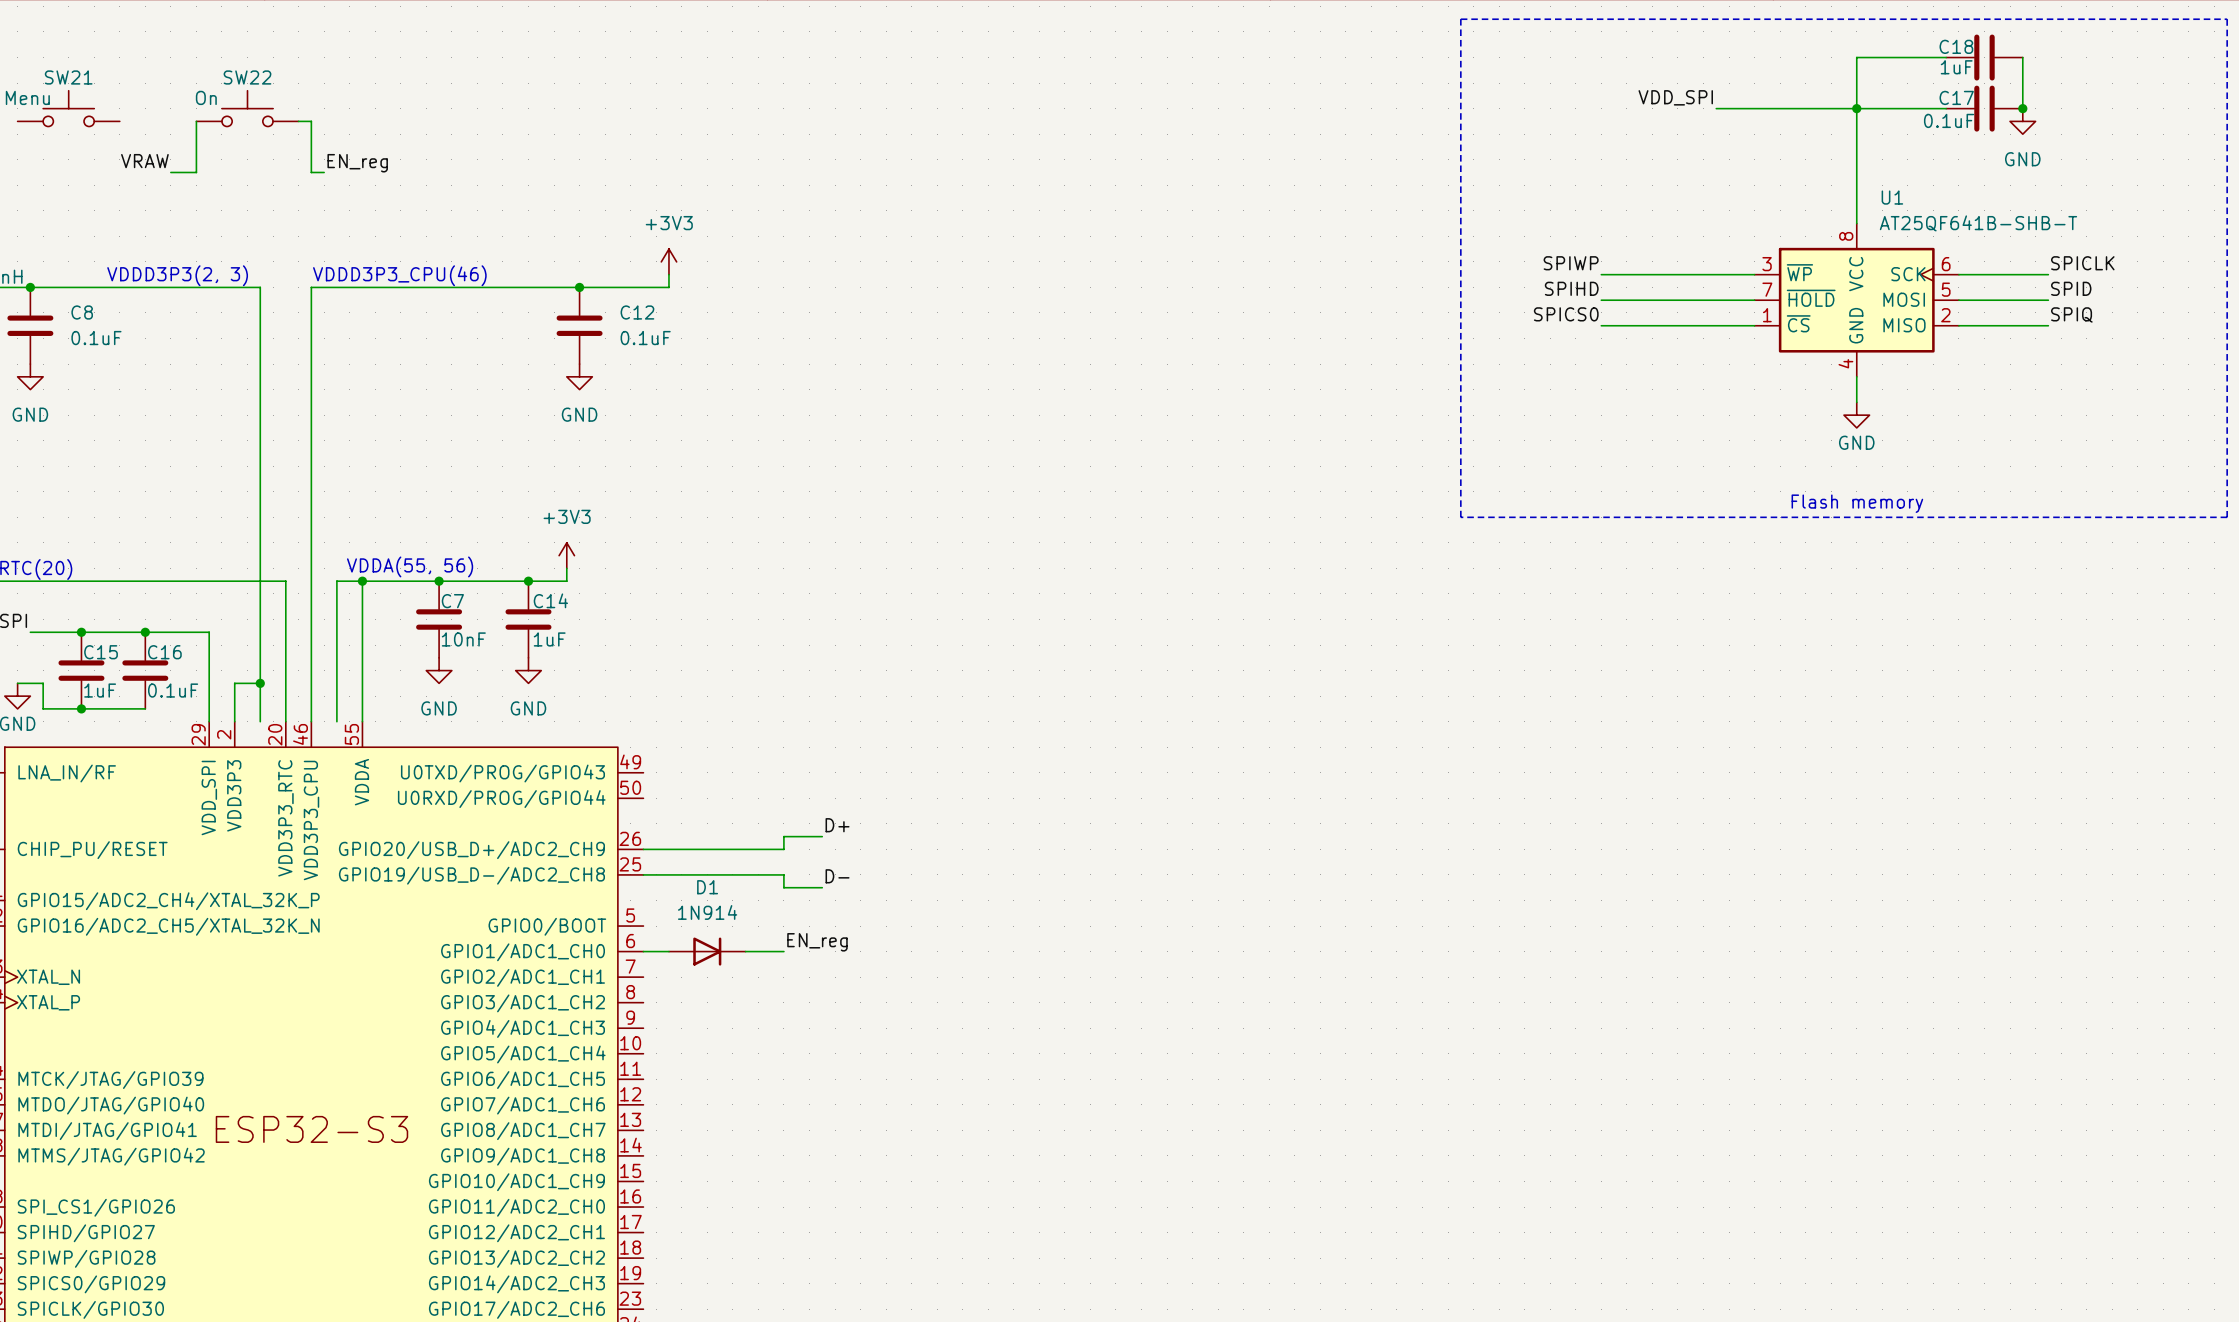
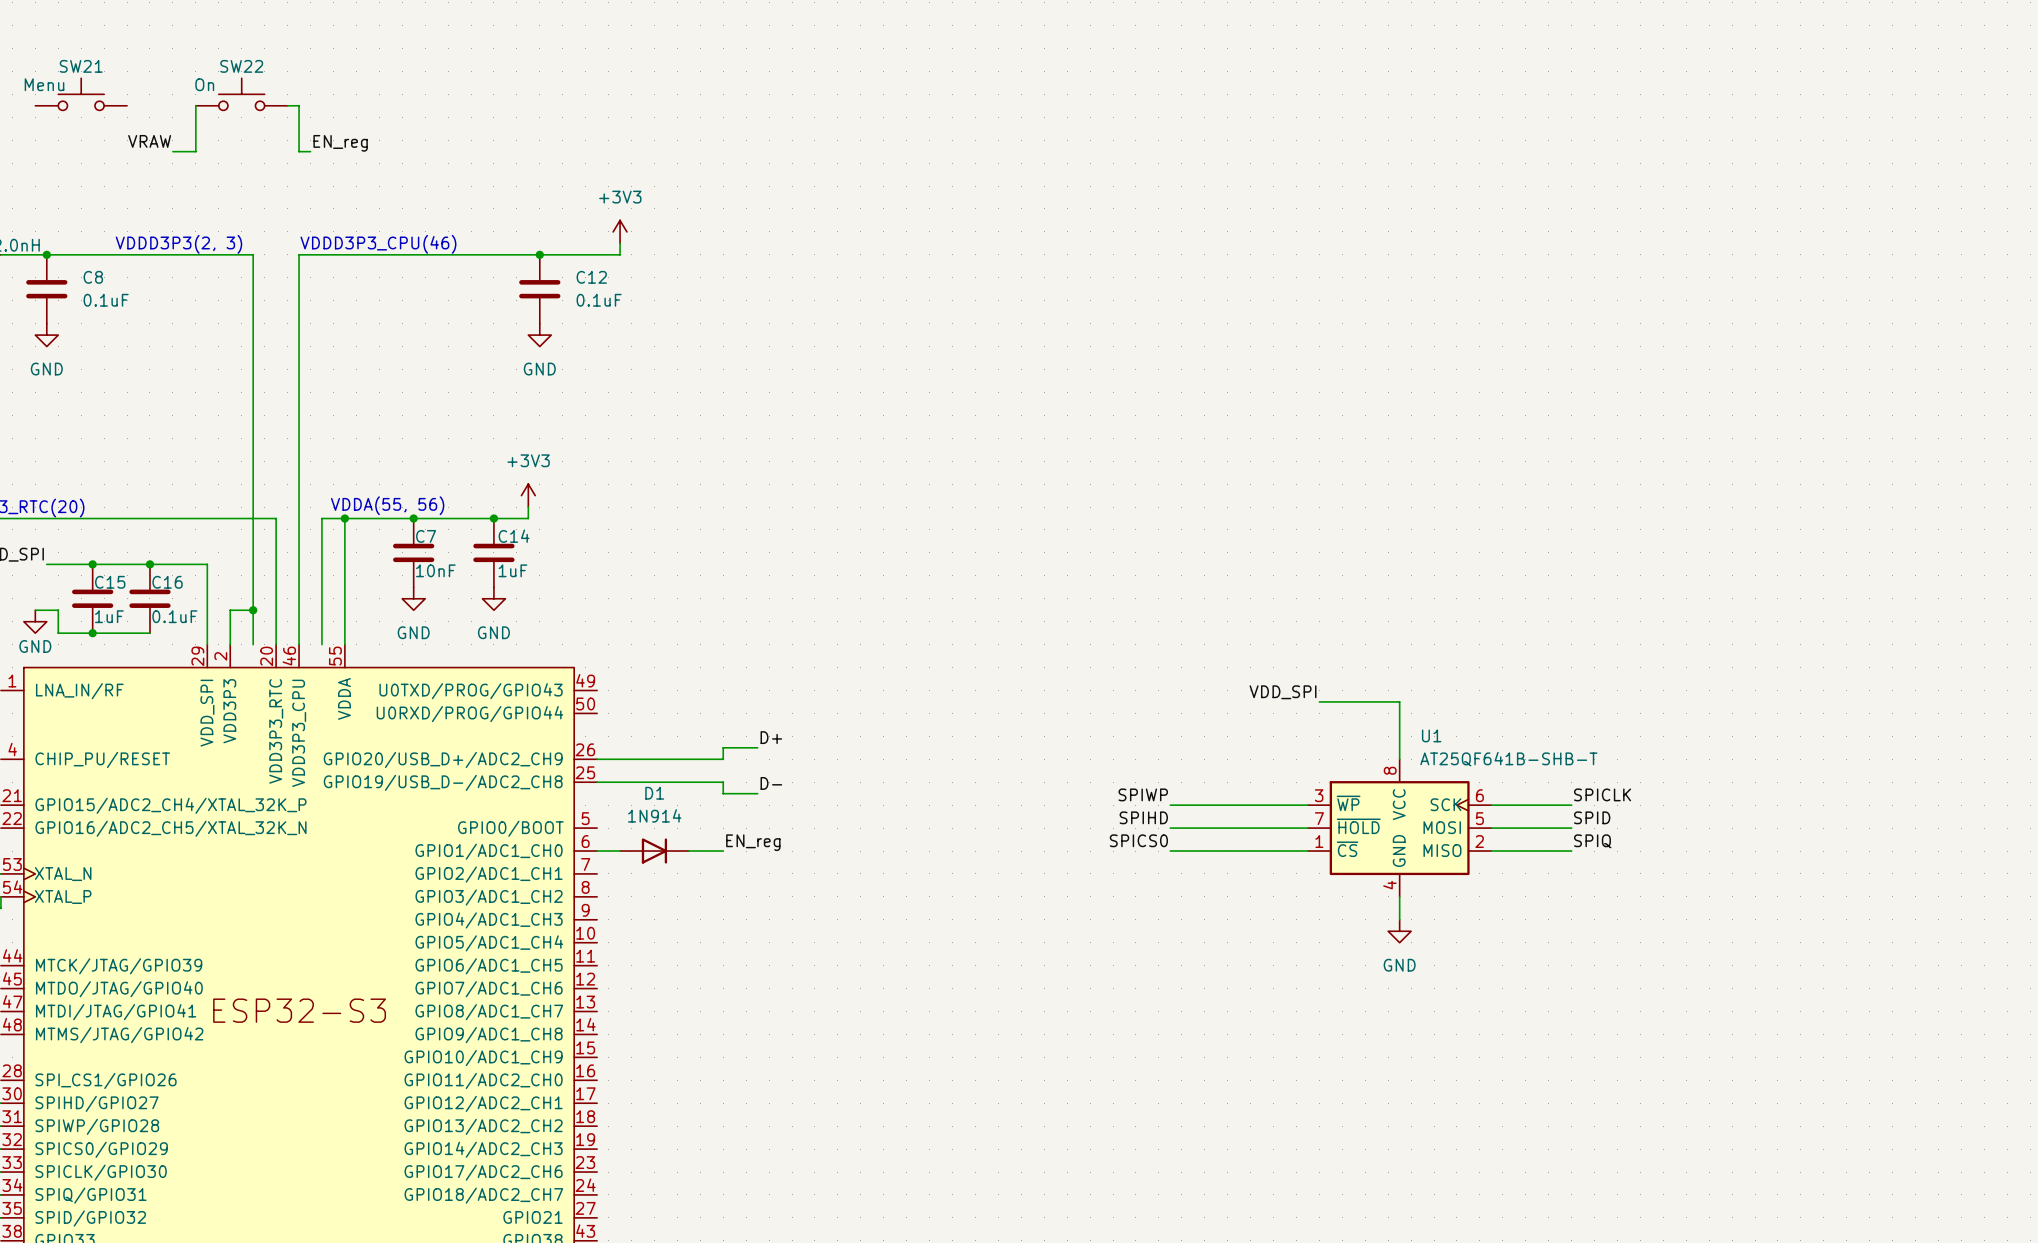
line: (1460, 19) (2227, 19) (2227, 517) (1460, 517) (1460, 19) -> none
wire: (1946, 57) (1856, 57) (1856, 223) -> none
C18: 1uF (1984, 57) -> none
wire: (2022, 57) (2022, 108) -> none
label: VDD_SPI (1675, 97) -> none
wire: (1716, 108) (1946, 108) -> none
junction: (1856, 108) -> none
C17: 0.1uF (1984, 108) -> none
junction: (2022, 108) -> none
power symbol: GND (2022, 121) -> none
label: SPIWP (1571, 263) -> none
label: SPICLK (2082, 263) -> none
wire: (1601, 274) (1754, 274) -> none
wire: (1958, 274) (2048, 274) -> none
label: SPIHD (1571, 288) -> none
label: SPID (2071, 288) -> none
wire: (1601, 300) (1754, 300) -> none
U1 position: (1856, 300) -> (1399, 828)
wire: (1958, 300) (2048, 300) -> none
label: SPICS0 (1566, 314) -> none
label: SPIQ (2071, 314) -> none
wire: (1601, 325) (1754, 325) -> none
wire: (1958, 325) (2048, 325) -> none
wire: (1856, 376) (1856, 402) -> none
power symbol: GND (1856, 415) -> none
text: Flash memory (1857, 503) -> none
label: none -> VDD_SPI (1283, 692)
wire: none -> (1319, 701) (1399, 701) (1399, 759)
label: none -> SPIWP (1143, 794)
label: none -> SPICLK (1602, 794)
wire: none -> (1170, 805) (1307, 805)
wire: none -> (1491, 805) (1571, 805)
label: none -> SPIHD (1143, 817)
label: none -> SPID (1592, 817)
wire: none -> (1170, 828) (1307, 828)
wire: none -> (1491, 828) (1571, 828)
label: none -> SPICS0 (1138, 840)
label: none -> SPIQ (1592, 841)
wire: none -> (1170, 851) (1307, 851)
wire: none -> (1491, 851) (1571, 851)
wire: none -> (1399, 896) (1399, 919)
power symbol: none -> GND (1399, 931)

